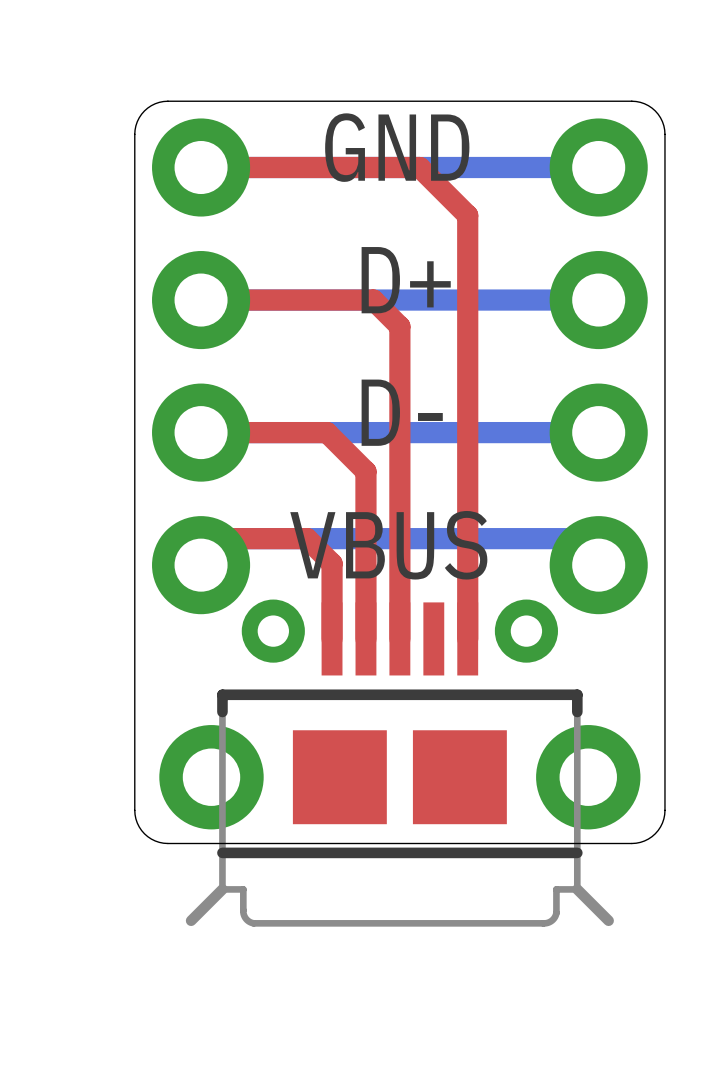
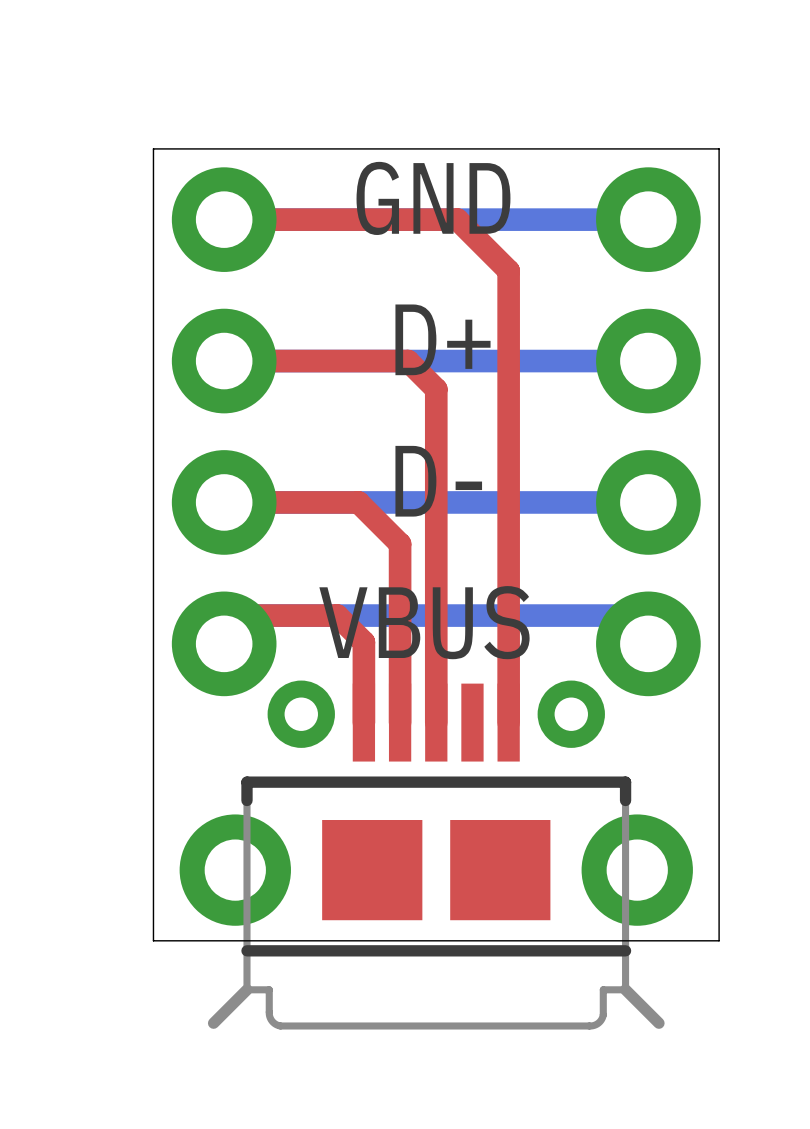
board edge: (167, 101) (155, 103) (144, 110) (137, 121) (134, 134) -> (188, 148) (153, 148) (153, 184)
board edge: (631, 101) (644, 103) (655, 110) (662, 121) (664, 134) -> (683, 148) (719, 148) (719, 184)
board edge: (134, 810) (137, 823) (144, 833) (155, 840) (167, 843) -> (153, 905) (153, 940) (188, 940)
board edge: (664, 810) (662, 823) (655, 833) (644, 840) (631, 843) -> (719, 905) (719, 940) (683, 940)

